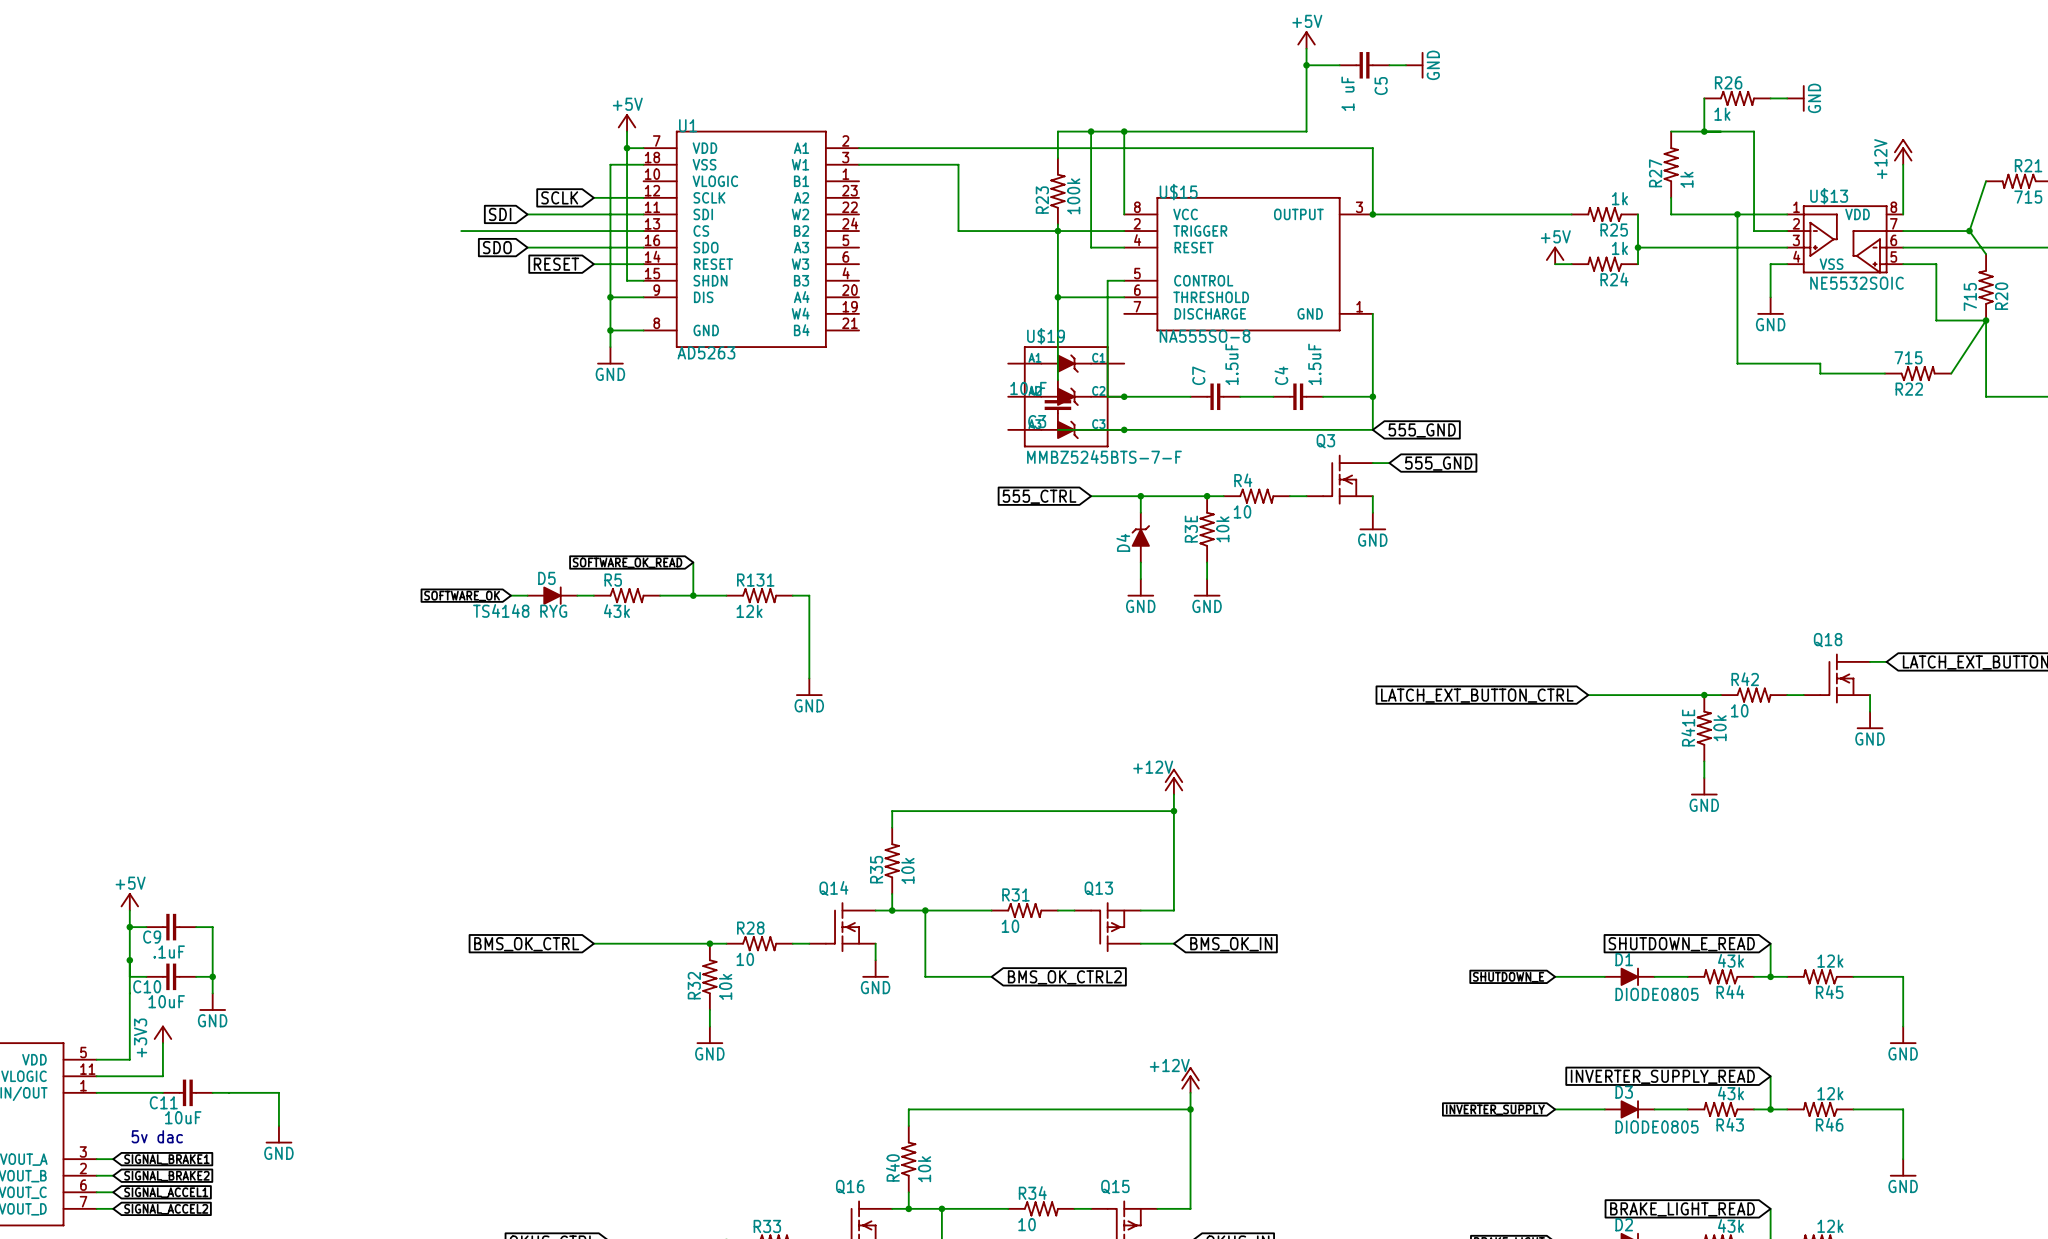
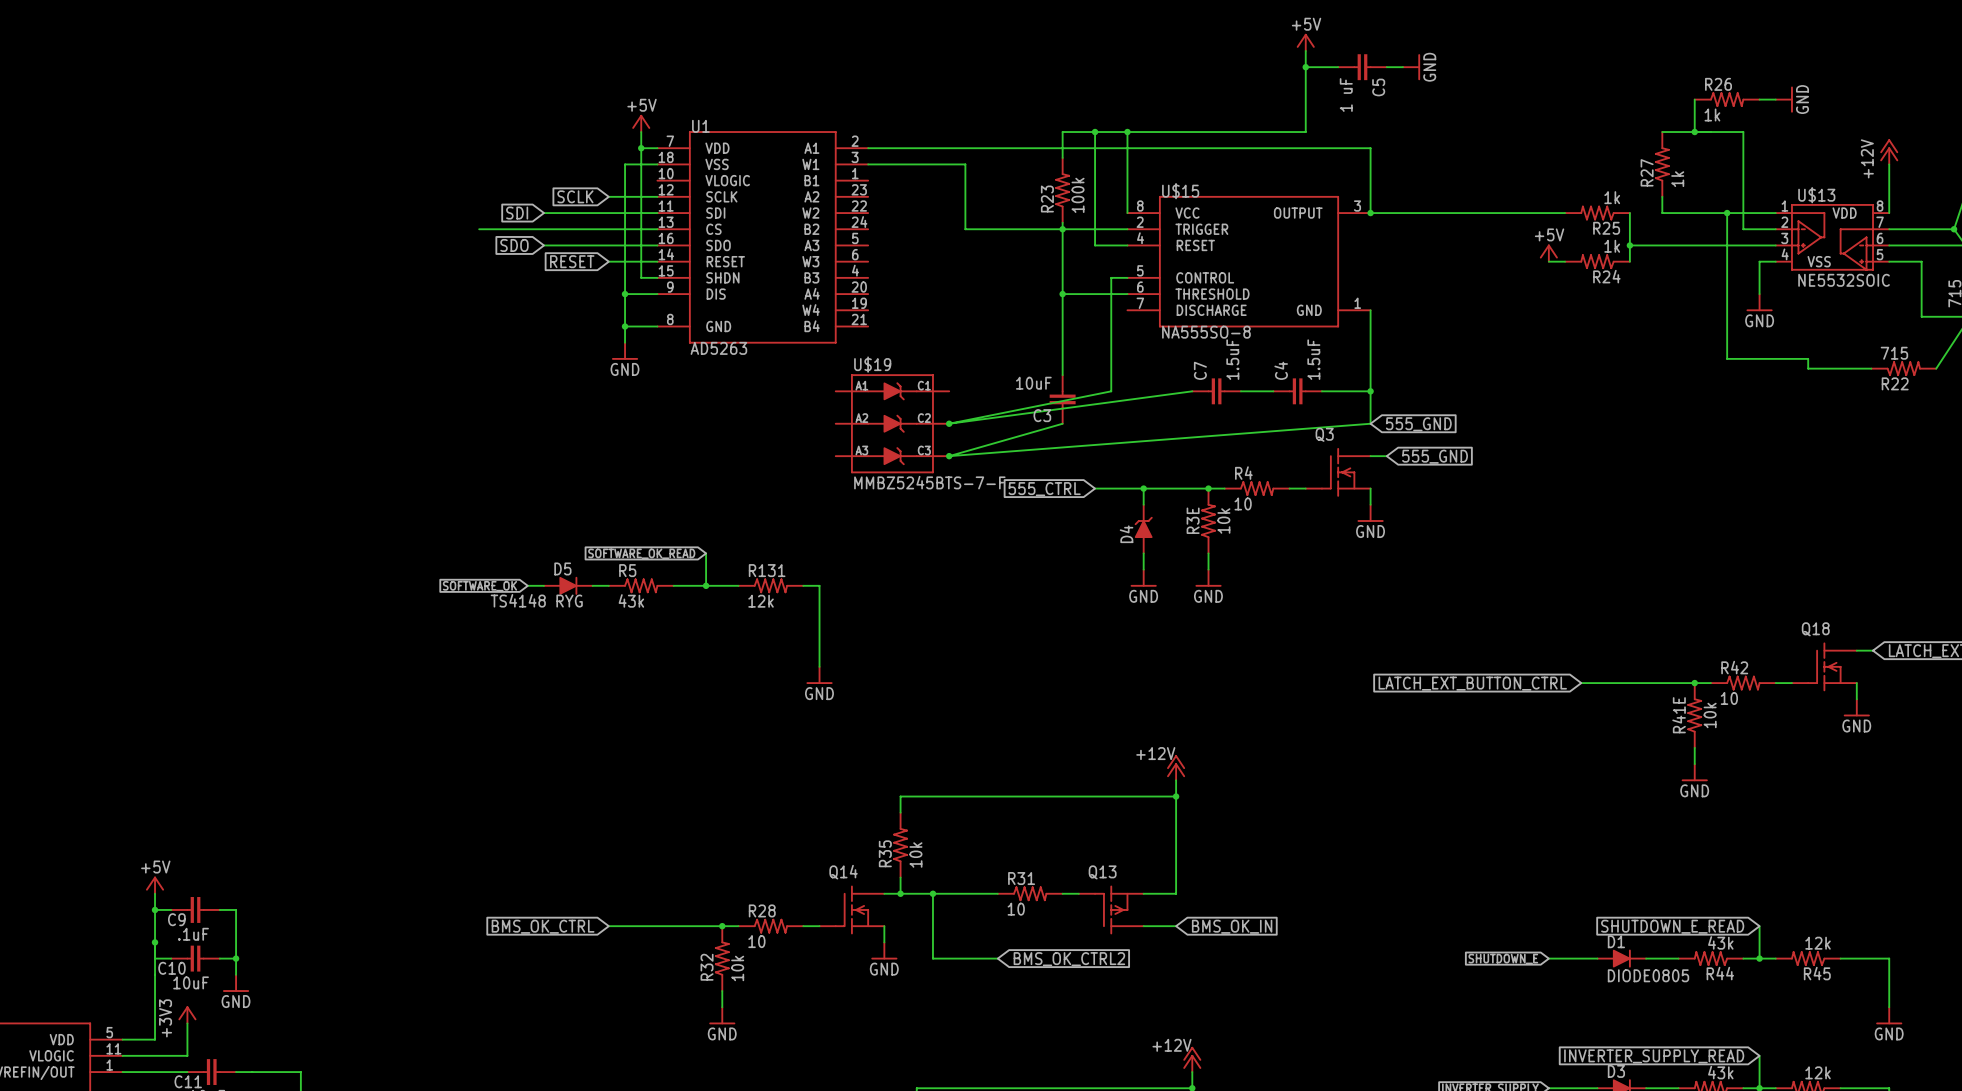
U$19 position: (1066, 396) -> (892, 423)
wire: (1107, 396) (1190, 396) -> (1111, 391) (949, 423) (1192, 391)
junction: (1124, 396) -> none
junction: none -> (949, 423)
wire: (1057, 429) (1372, 429) -> (1062, 423) (949, 456) (1370, 423)
junction: (1124, 429) -> none
junction: none -> (949, 456)

